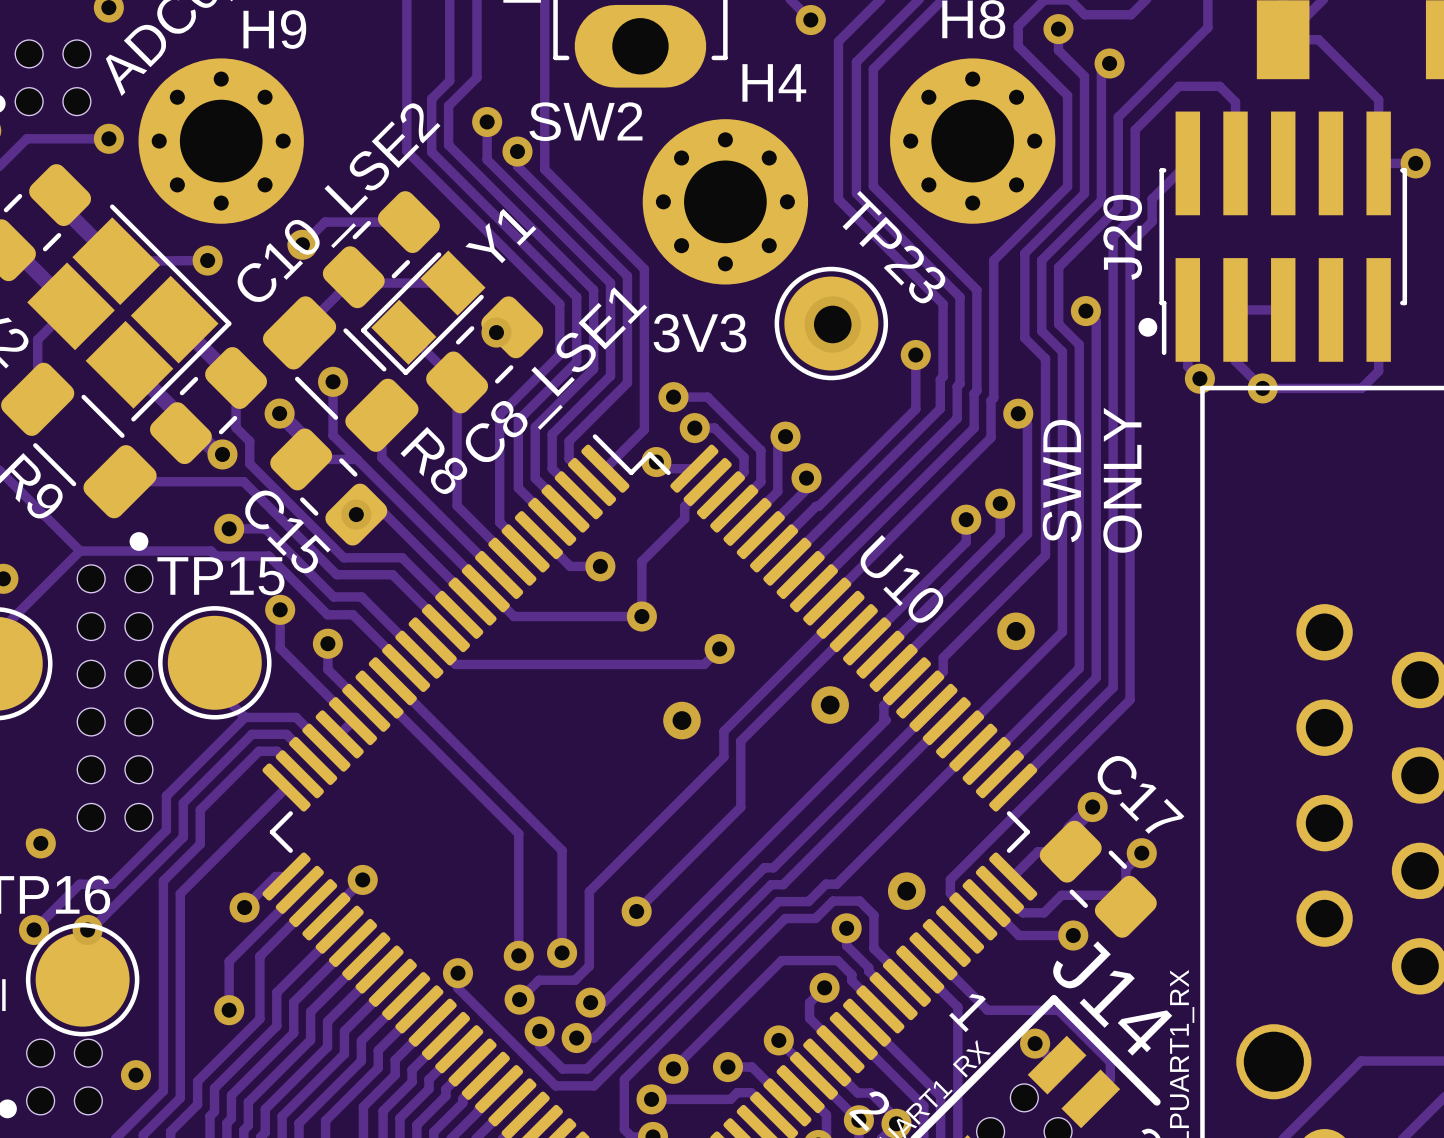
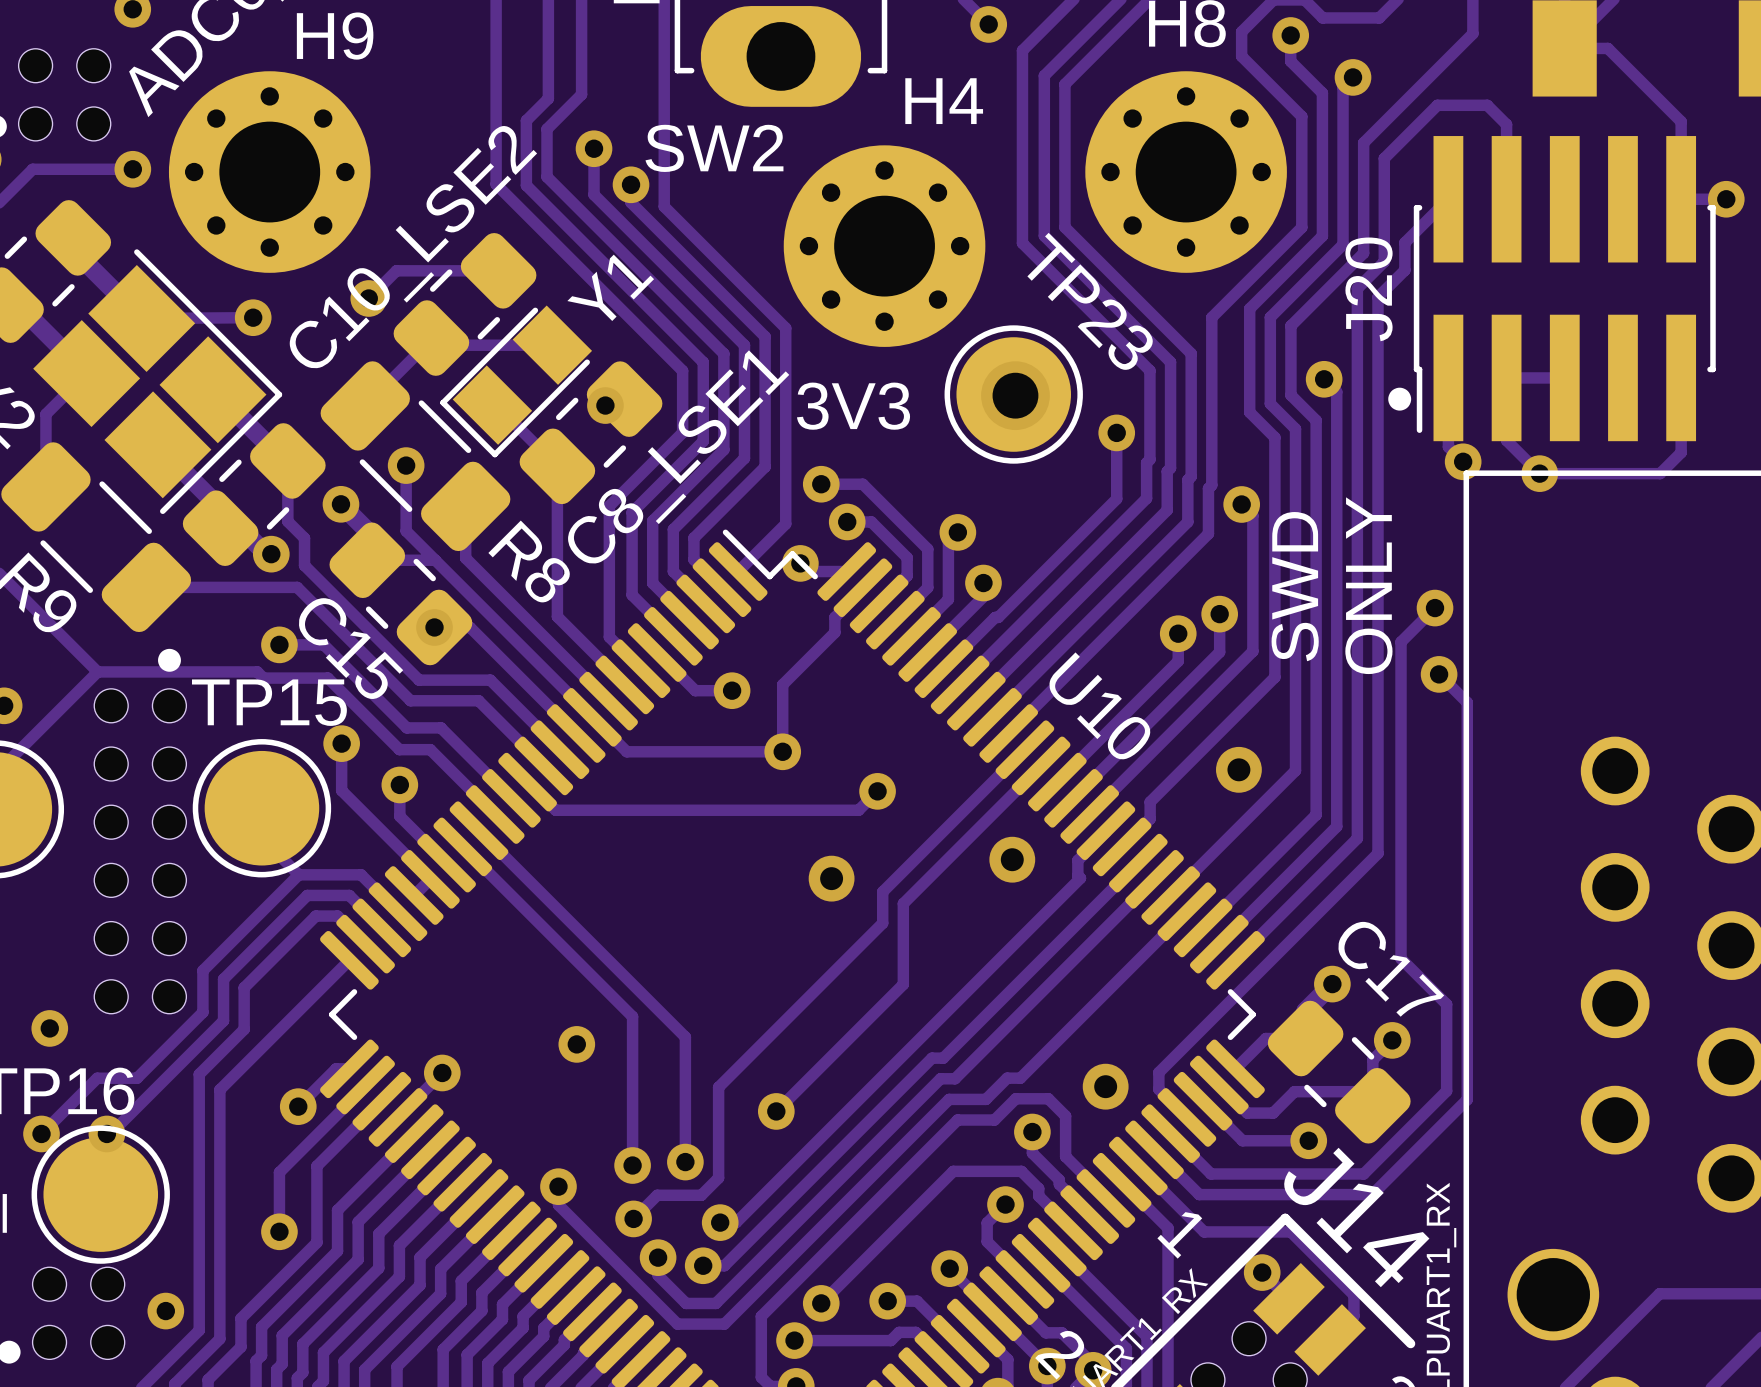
track: none -> (1435, 608) (1401, 642) (1401, 958) (1446, 1004) (1446, 1091) (1363, 1173) (1211, 1173) (1170, 1133)
via: none -> (1435, 608)
track: none -> (1439, 674) (1467, 702) (1467, 1099) (1372, 1194) (1199, 1194) (1154, 1149)
via: none -> (1439, 674)
via: none -> (576, 1044)

